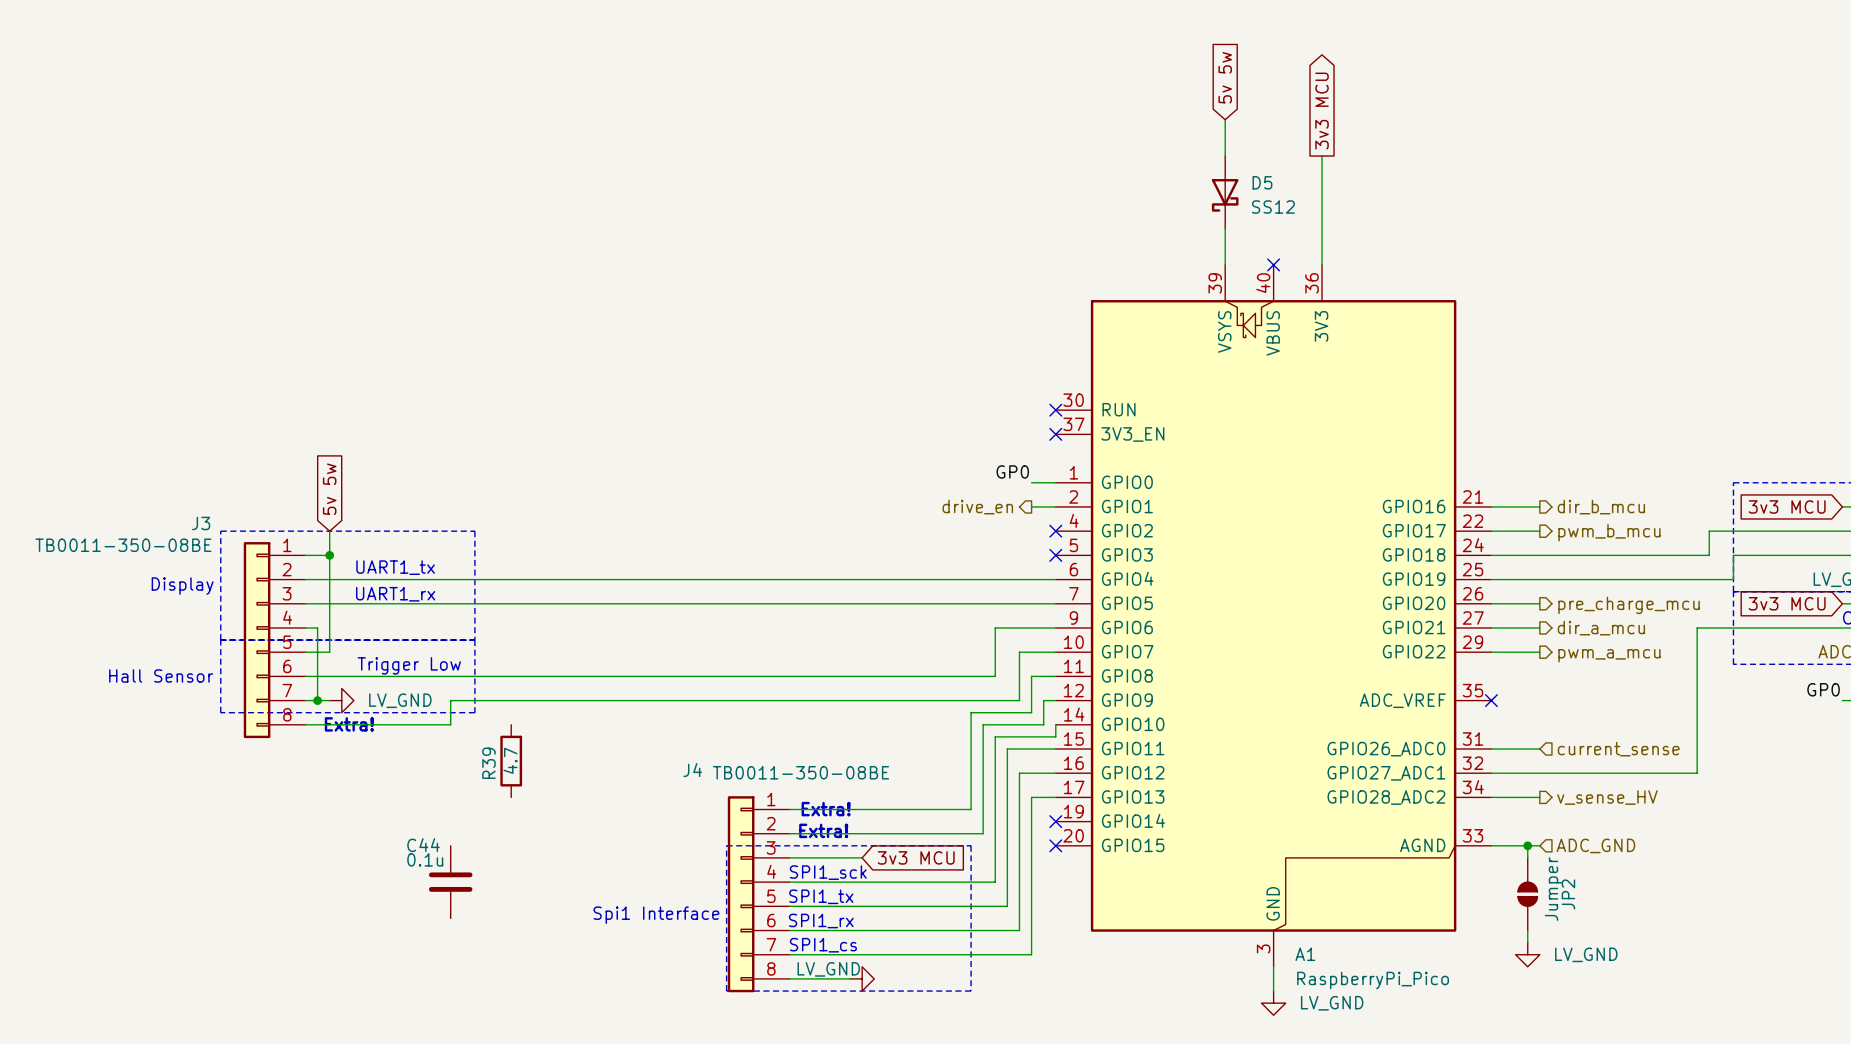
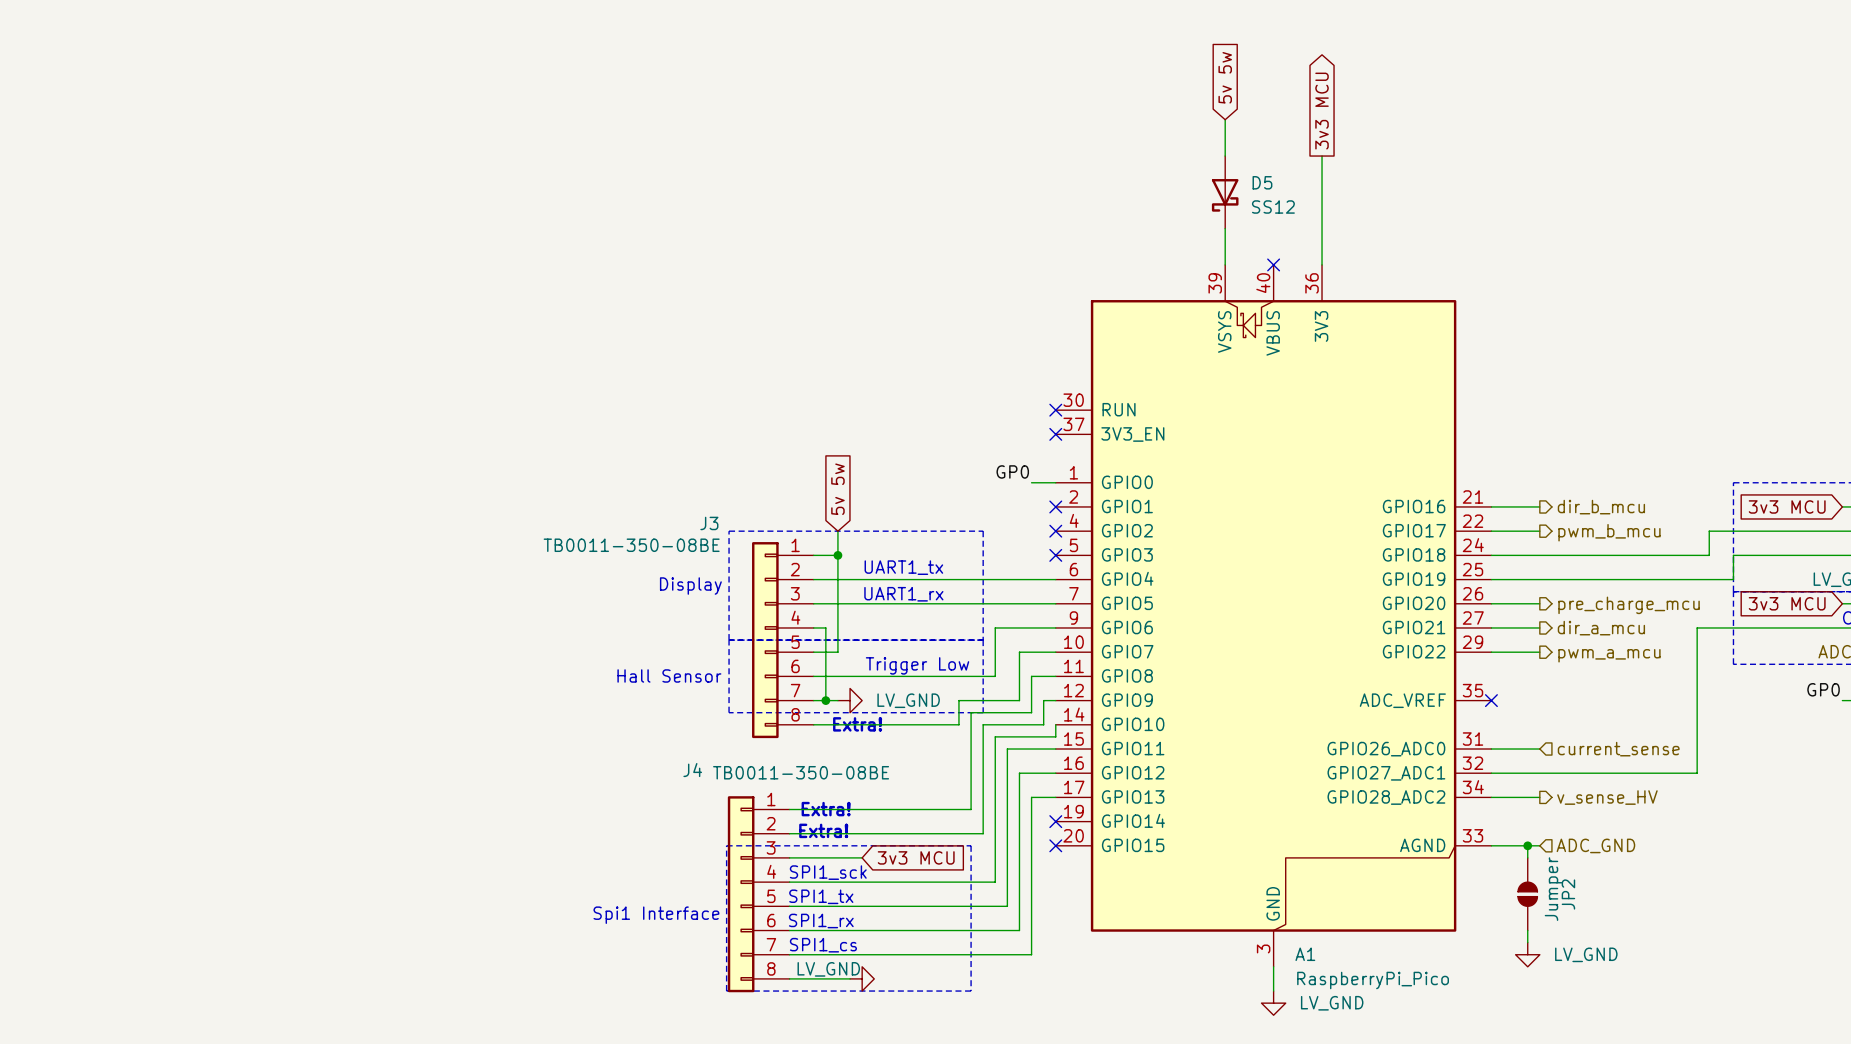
global label: 5v 5w (329, 489) -> none
global label: none -> 5v 5w (837, 489)
wire: (1031, 506) (1055, 506) -> (813, 555) (837, 555)
no-connect mark: none -> (1055, 506)
hierarchical label: drive_en (977, 507) -> none
line: (220, 531) (474, 531) (474, 712) (220, 712) (220, 531) -> none
wire: (329, 531) (329, 652) (305, 652) -> none
line: none -> (729, 531) (983, 531) (983, 712) (729, 712) (729, 531)
wire: none -> (837, 531) (837, 652) (813, 652)
wire: (305, 555) (329, 555) -> none
junction: (329, 555) -> none
junction: none -> (837, 555)
text: UART1_tx (395, 567) -> none
text: none -> UART1_tx (903, 567)
wire: (305, 579) (813, 579) -> none
text: Display (182, 586) -> none
text: none -> Display (690, 586)
text: UART1_rx (395, 594) -> none
text: none -> UART1_rx (903, 594)
wire: (305, 603) (813, 603) -> none
wire: (305, 627) (317, 627) (317, 700) -> none
wire: none -> (813, 627) (825, 627) (825, 700)
line: (220, 640) (474, 640) -> none
J3 position: (274, 640) -> (782, 640)
line: none -> (729, 640) (983, 640)
text: Trigger Low (409, 665) -> none
text: none -> Trigger Low (917, 665)
text: Hall Sensor (161, 675) -> none
text: none -> Hall Sensor (669, 675)
wire: (305, 676) (813, 676) -> none
wire: (305, 700) (329, 700) -> none
junction: (317, 700) -> none
power symbol: LV_GND (341, 700) -> none
wire: (813, 700) (450, 700) (450, 724) (305, 724) -> none
junction: none -> (825, 700)
wire: (837, 700) (958, 700) -> (813, 724) (958, 724) (958, 700)
power symbol: none -> LV_GND (850, 700)
text: Extra! (349, 724) -> none
text: none -> Extra! (857, 724)
R39: 4.7 (511, 761) -> none
C44: 0.1u (450, 882) -> none

